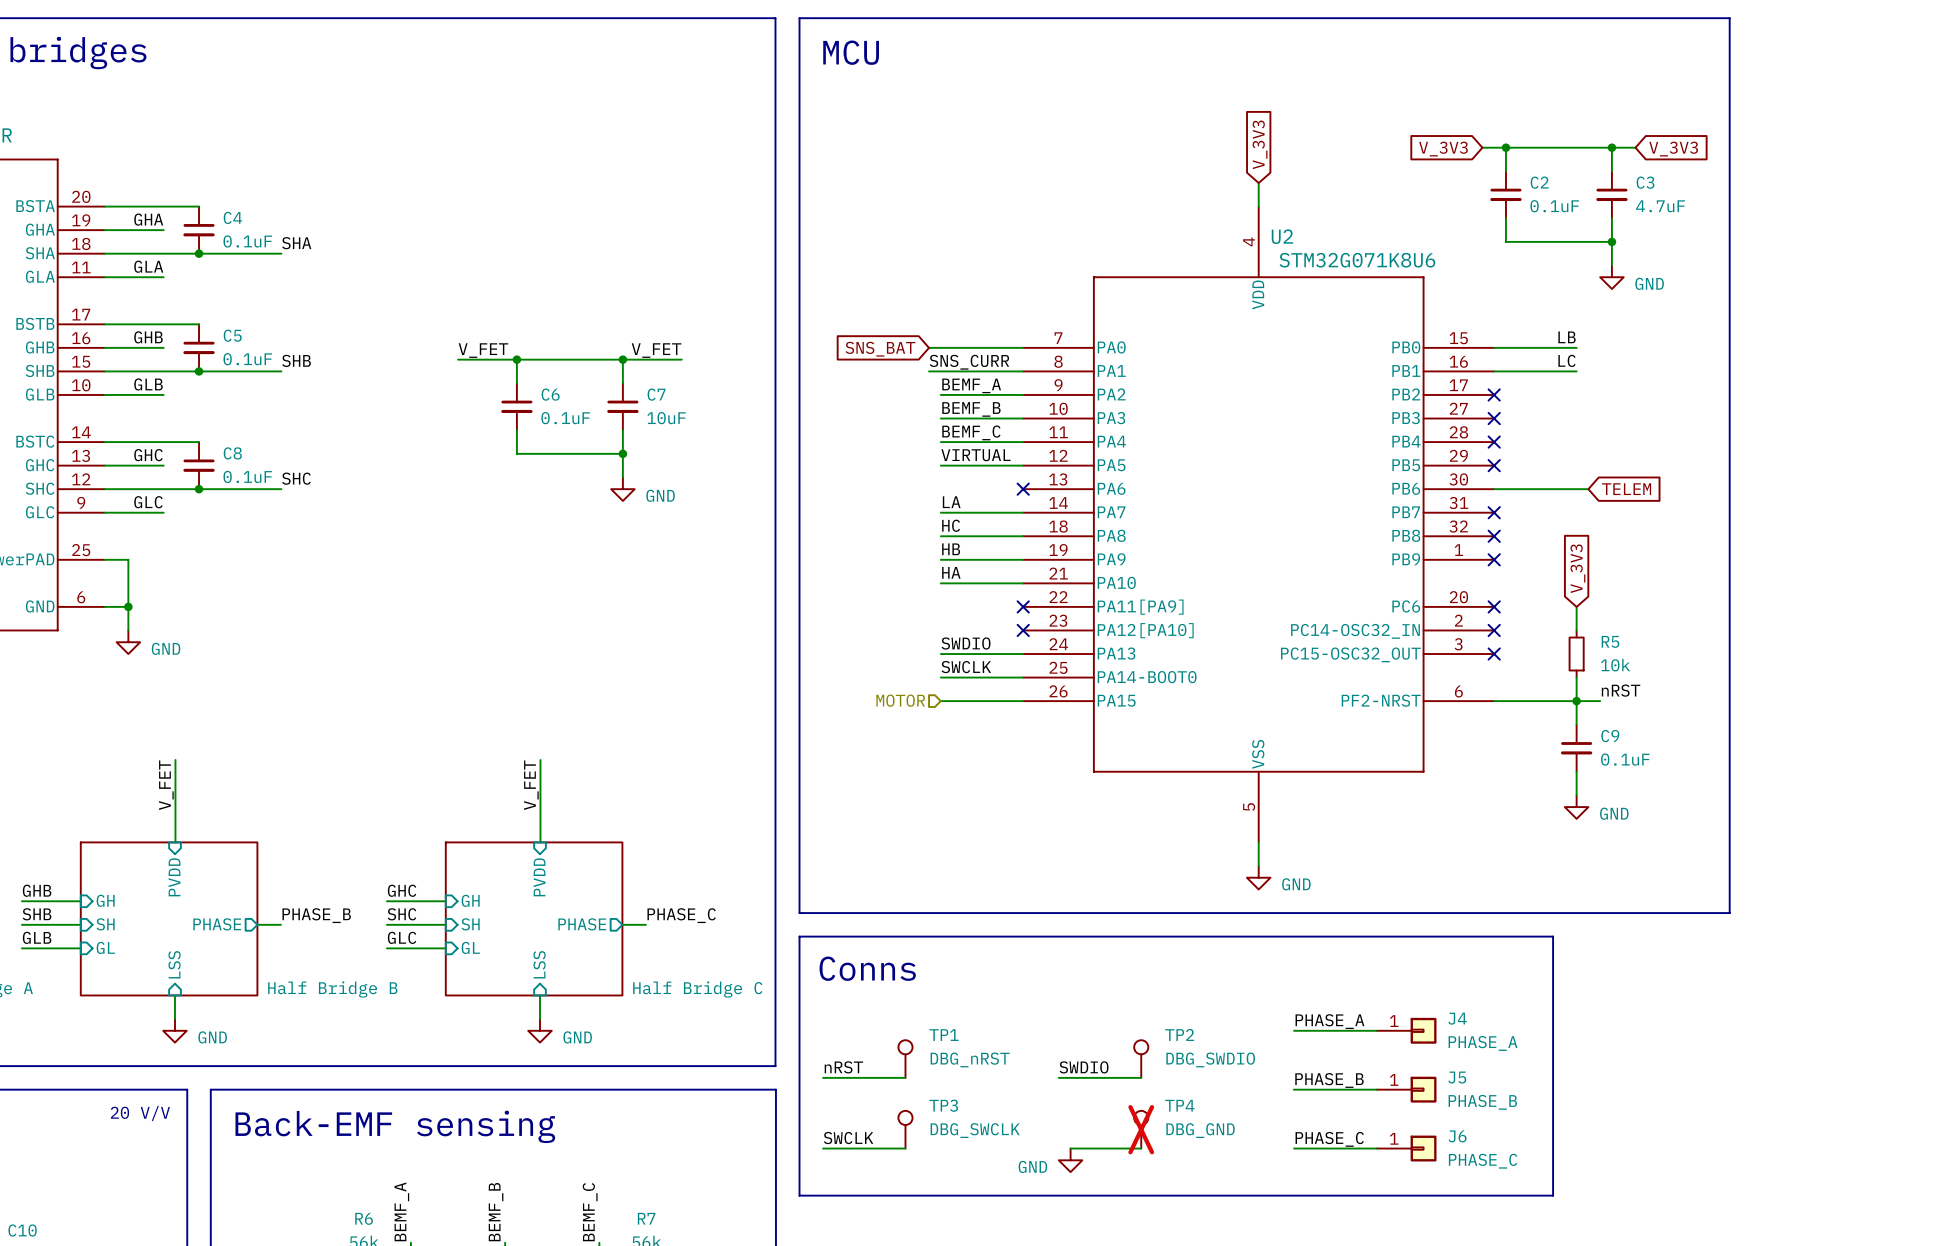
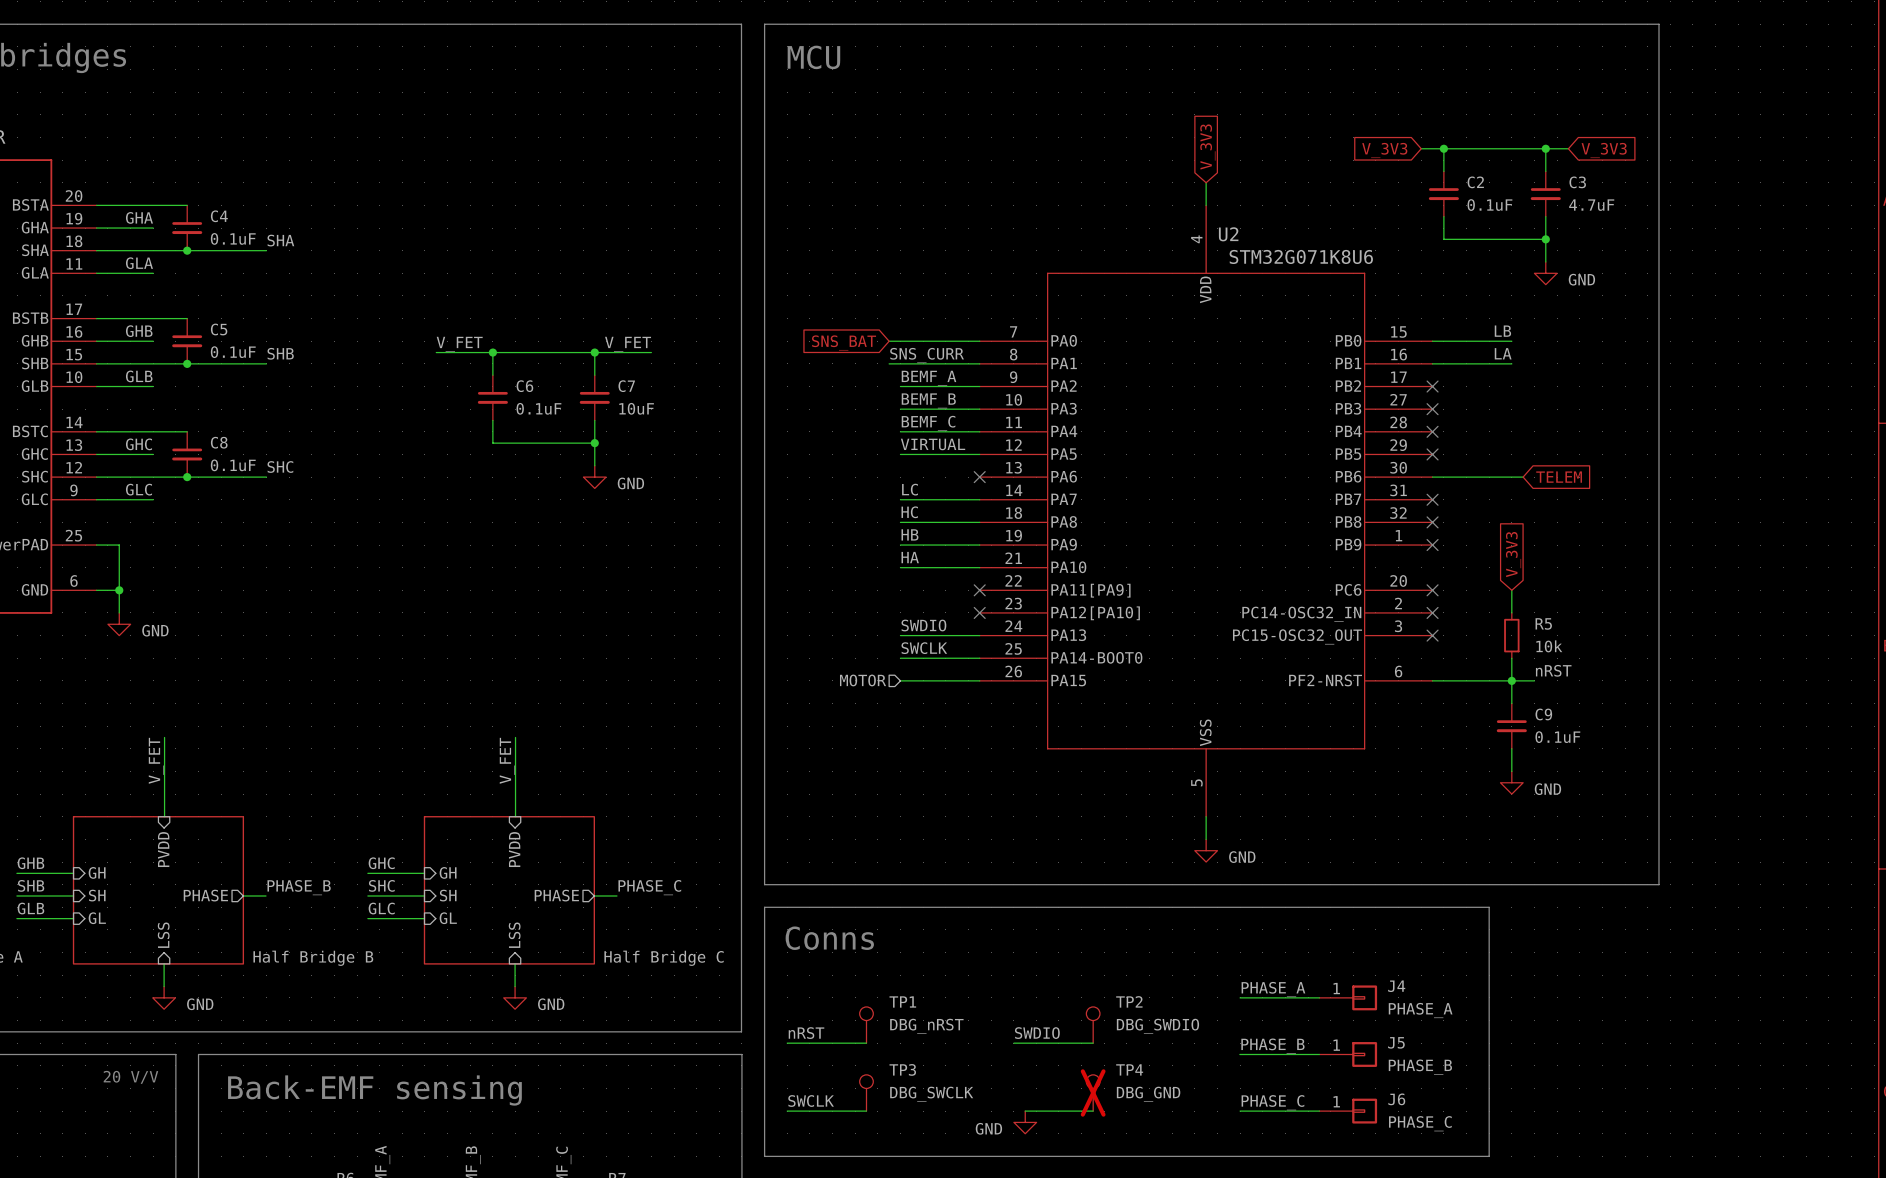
label: LC (1566, 360) -> LA (1503, 353)
label: LA (951, 502) -> LC (910, 489)

